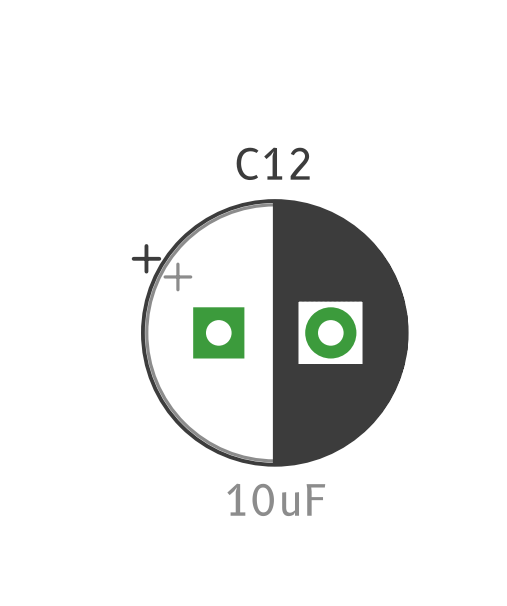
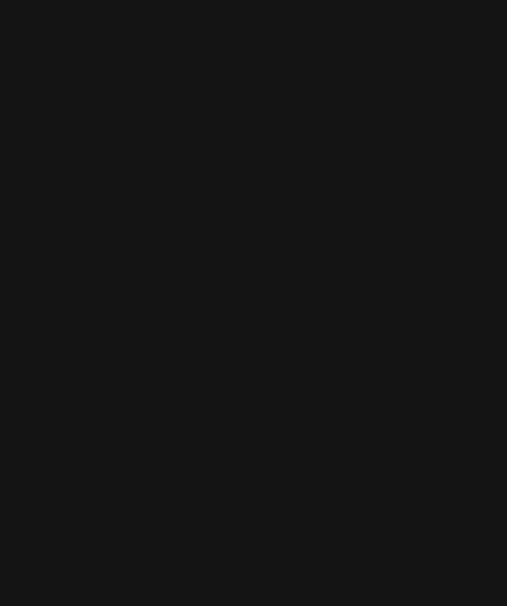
C12: 10uF (270, 332) -> none

